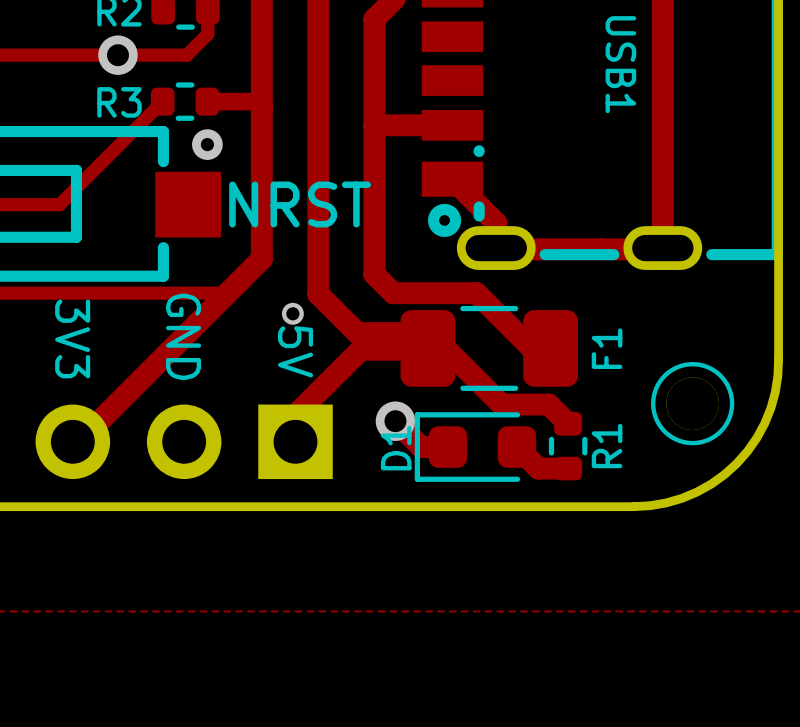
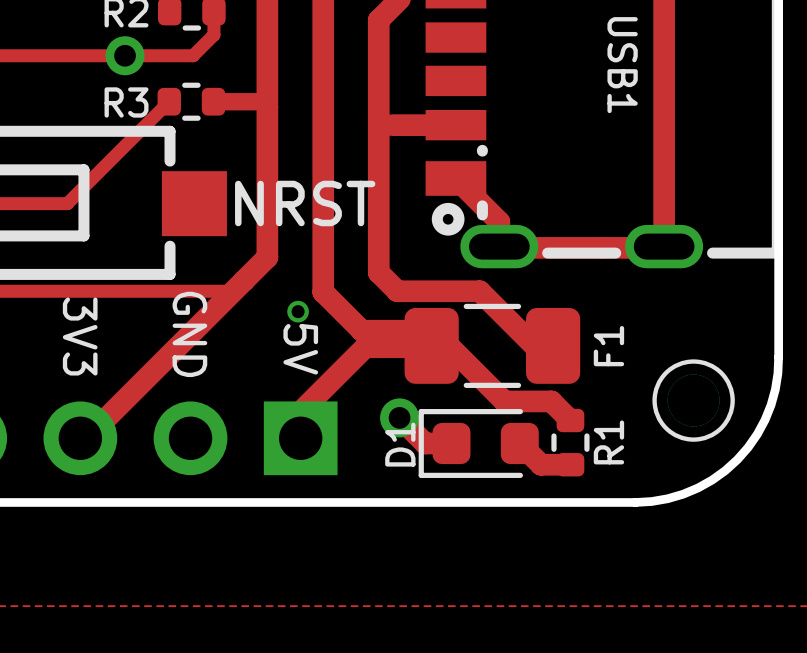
via: (207, 144) -> none

